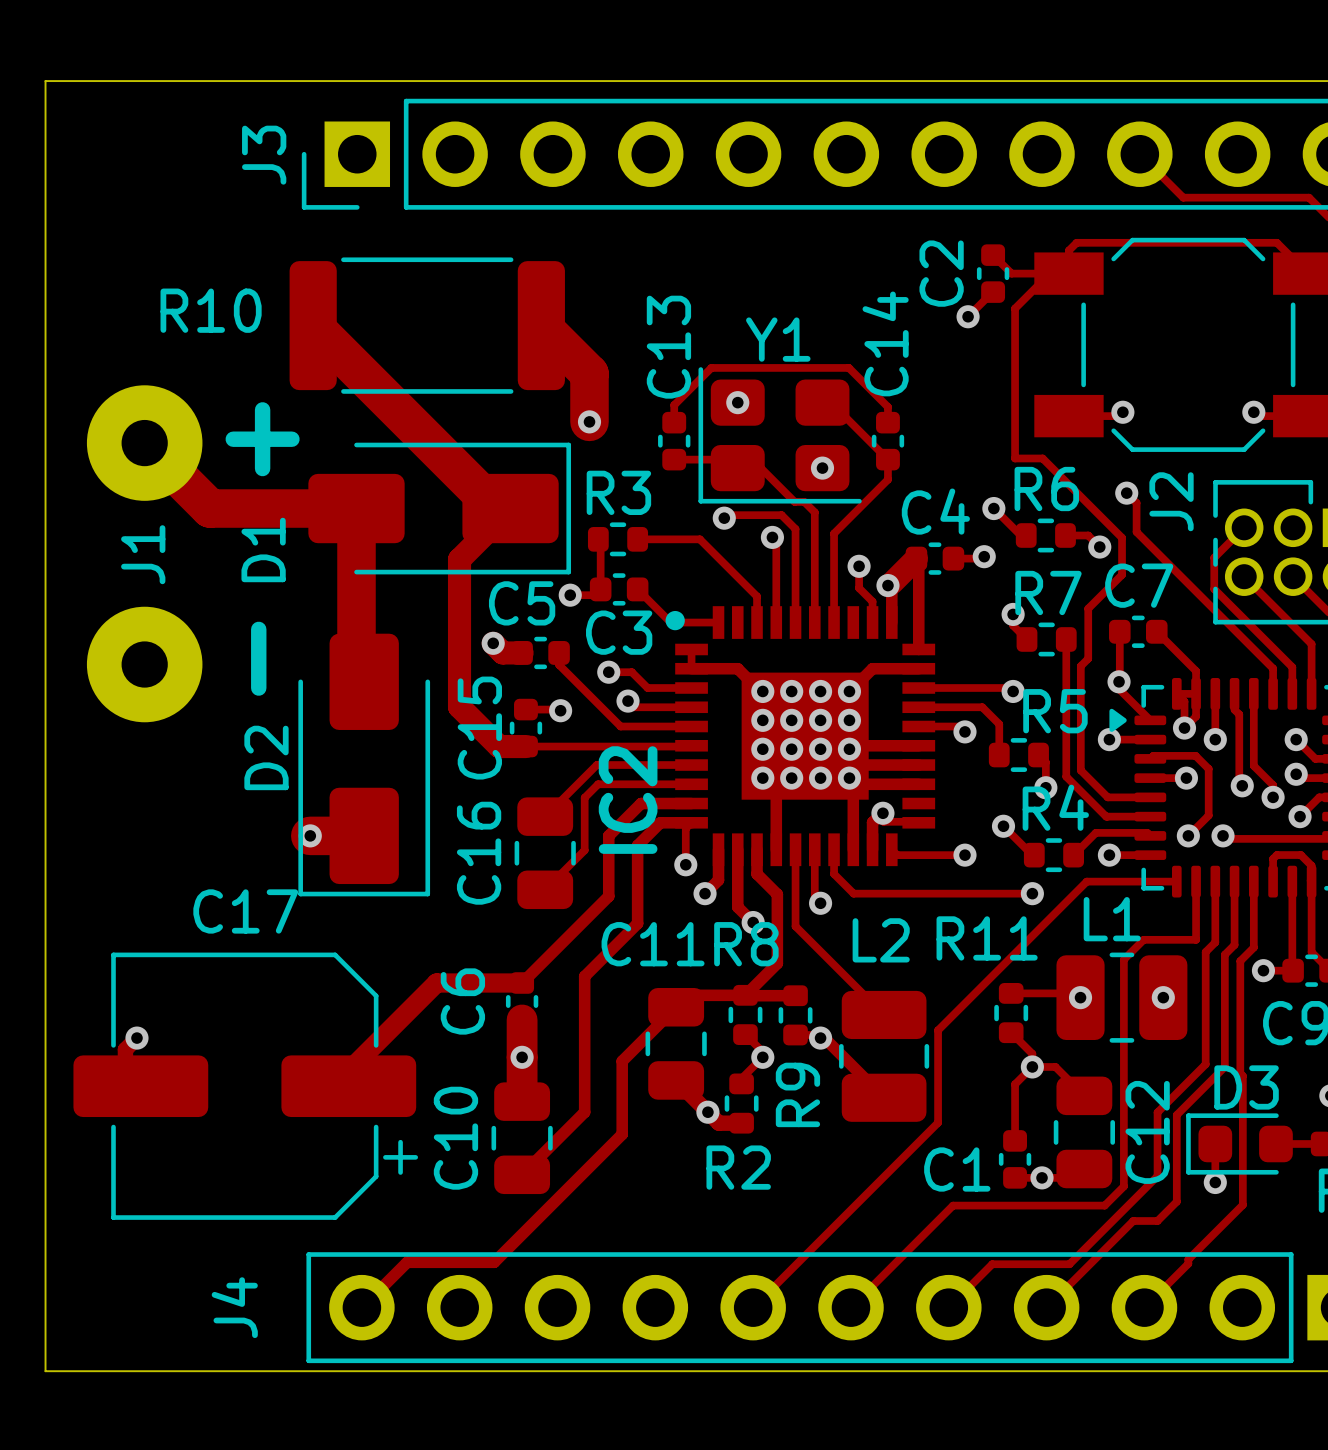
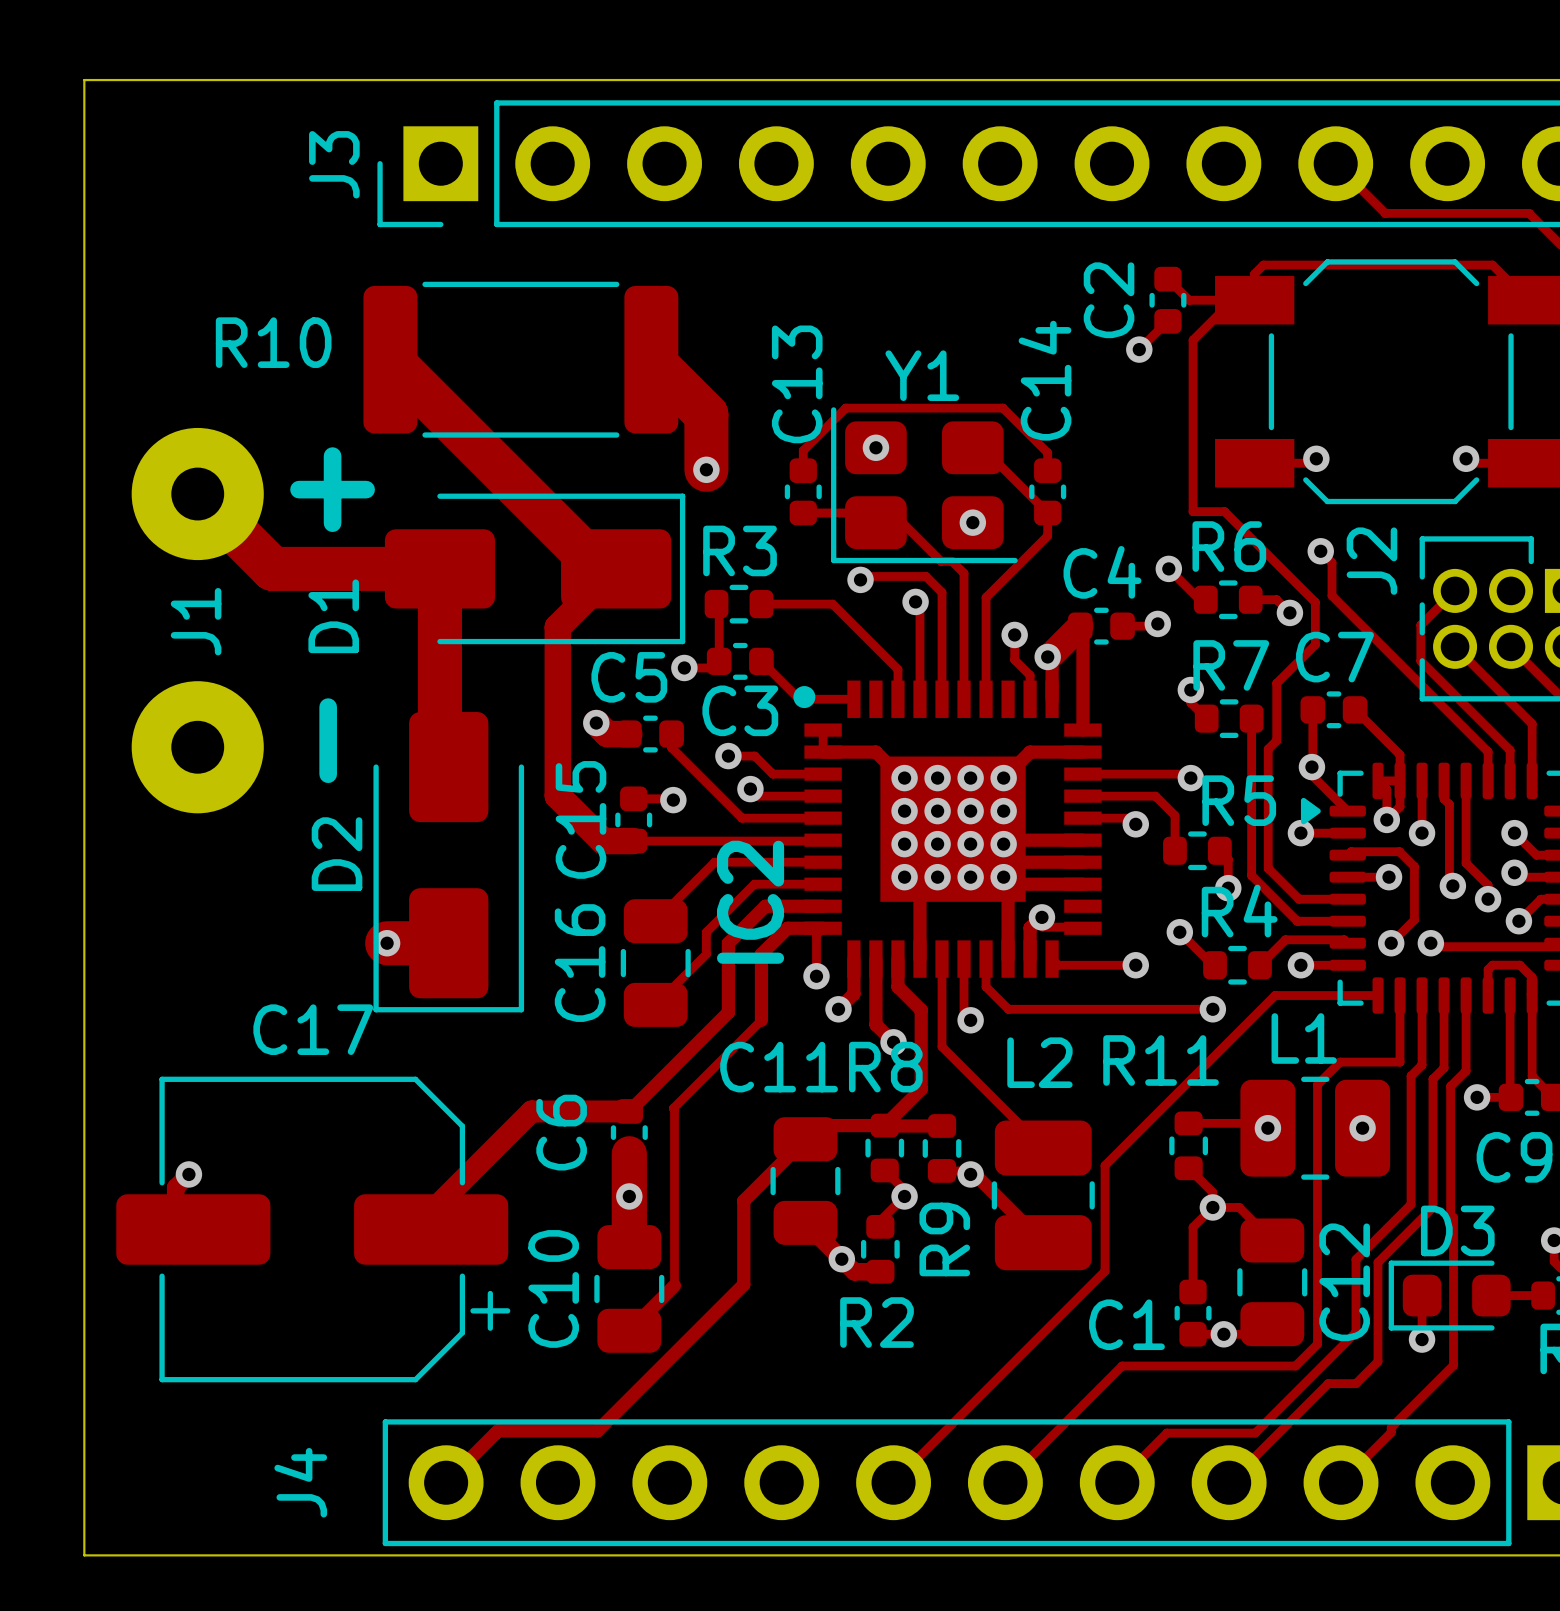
track: (631, 784) (598, 784) (584, 797) (584, 850) -> (754, 884) (706, 932) (706, 954) (700, 959)
track: (637, 903) (637, 923) (584, 976) (584, 1112) (561, 1135) -> (761, 1020) (673, 1108) (674, 1285)

